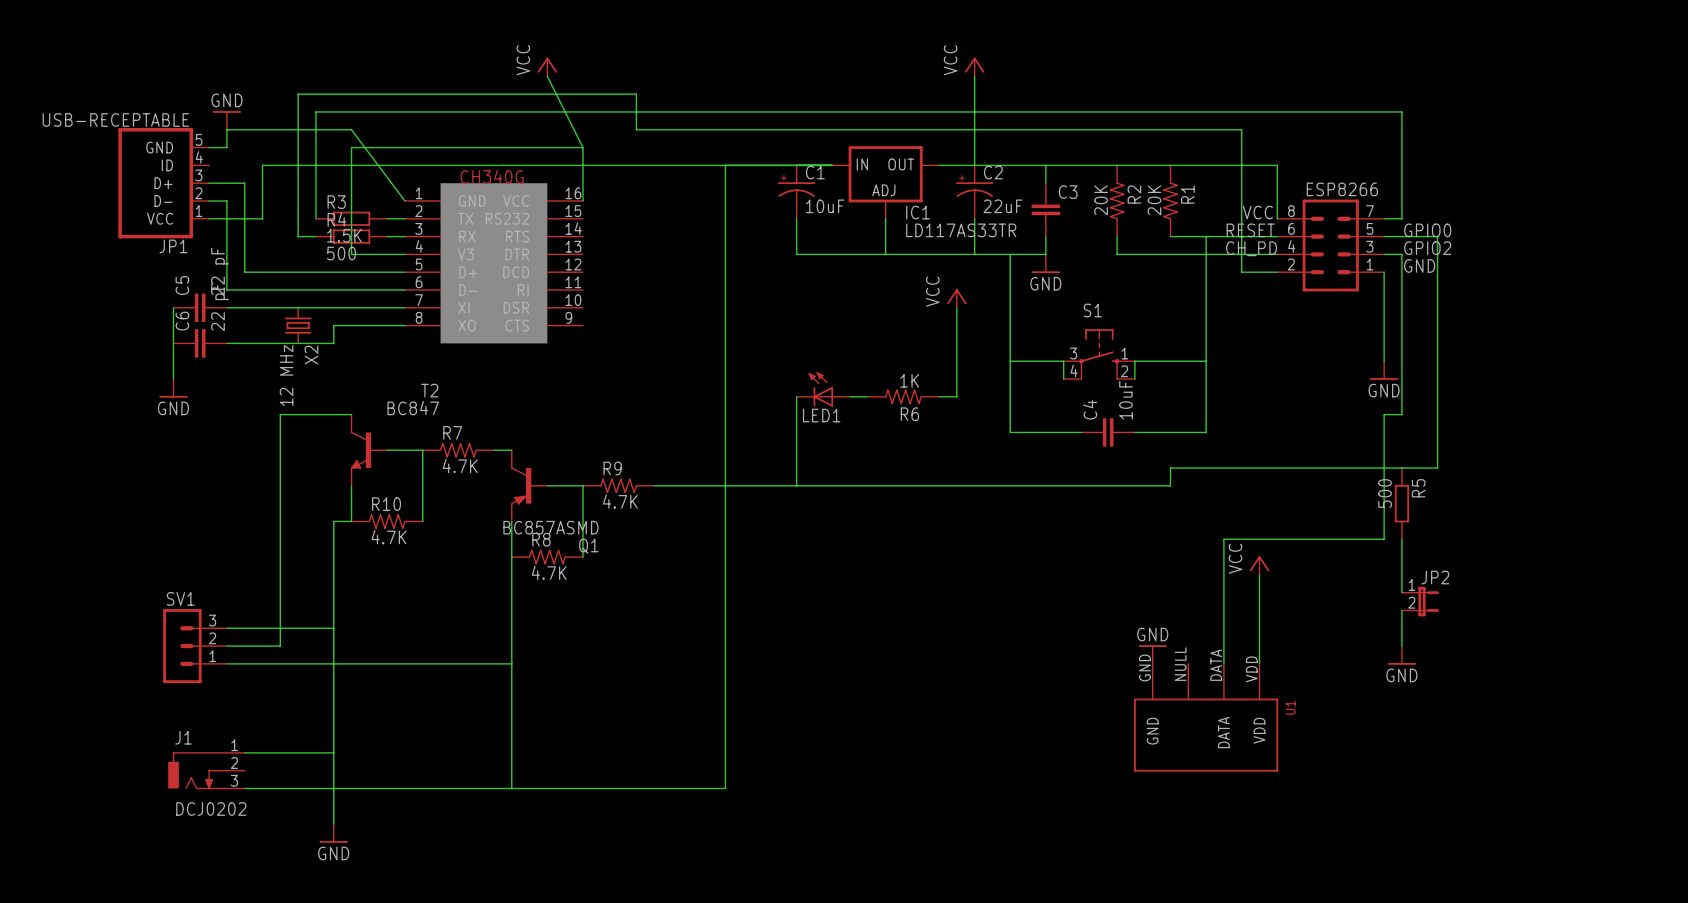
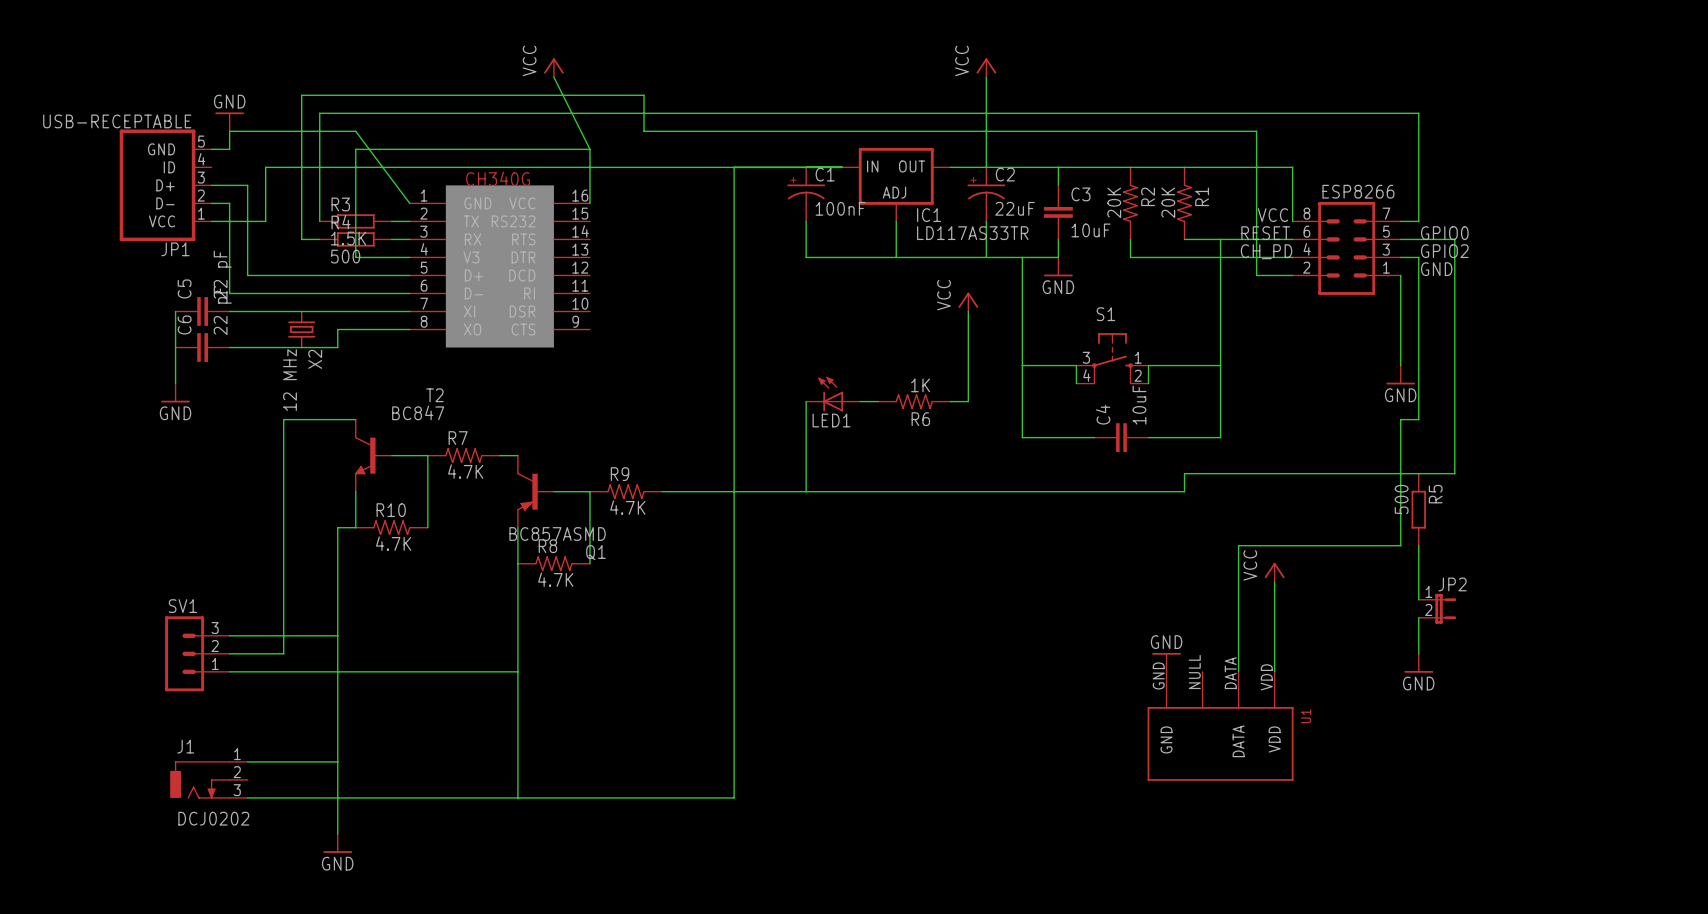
C1 value: 10uF (825, 206) -> 100nF (840, 208)
C3 value: none -> 10uF (1090, 230)

